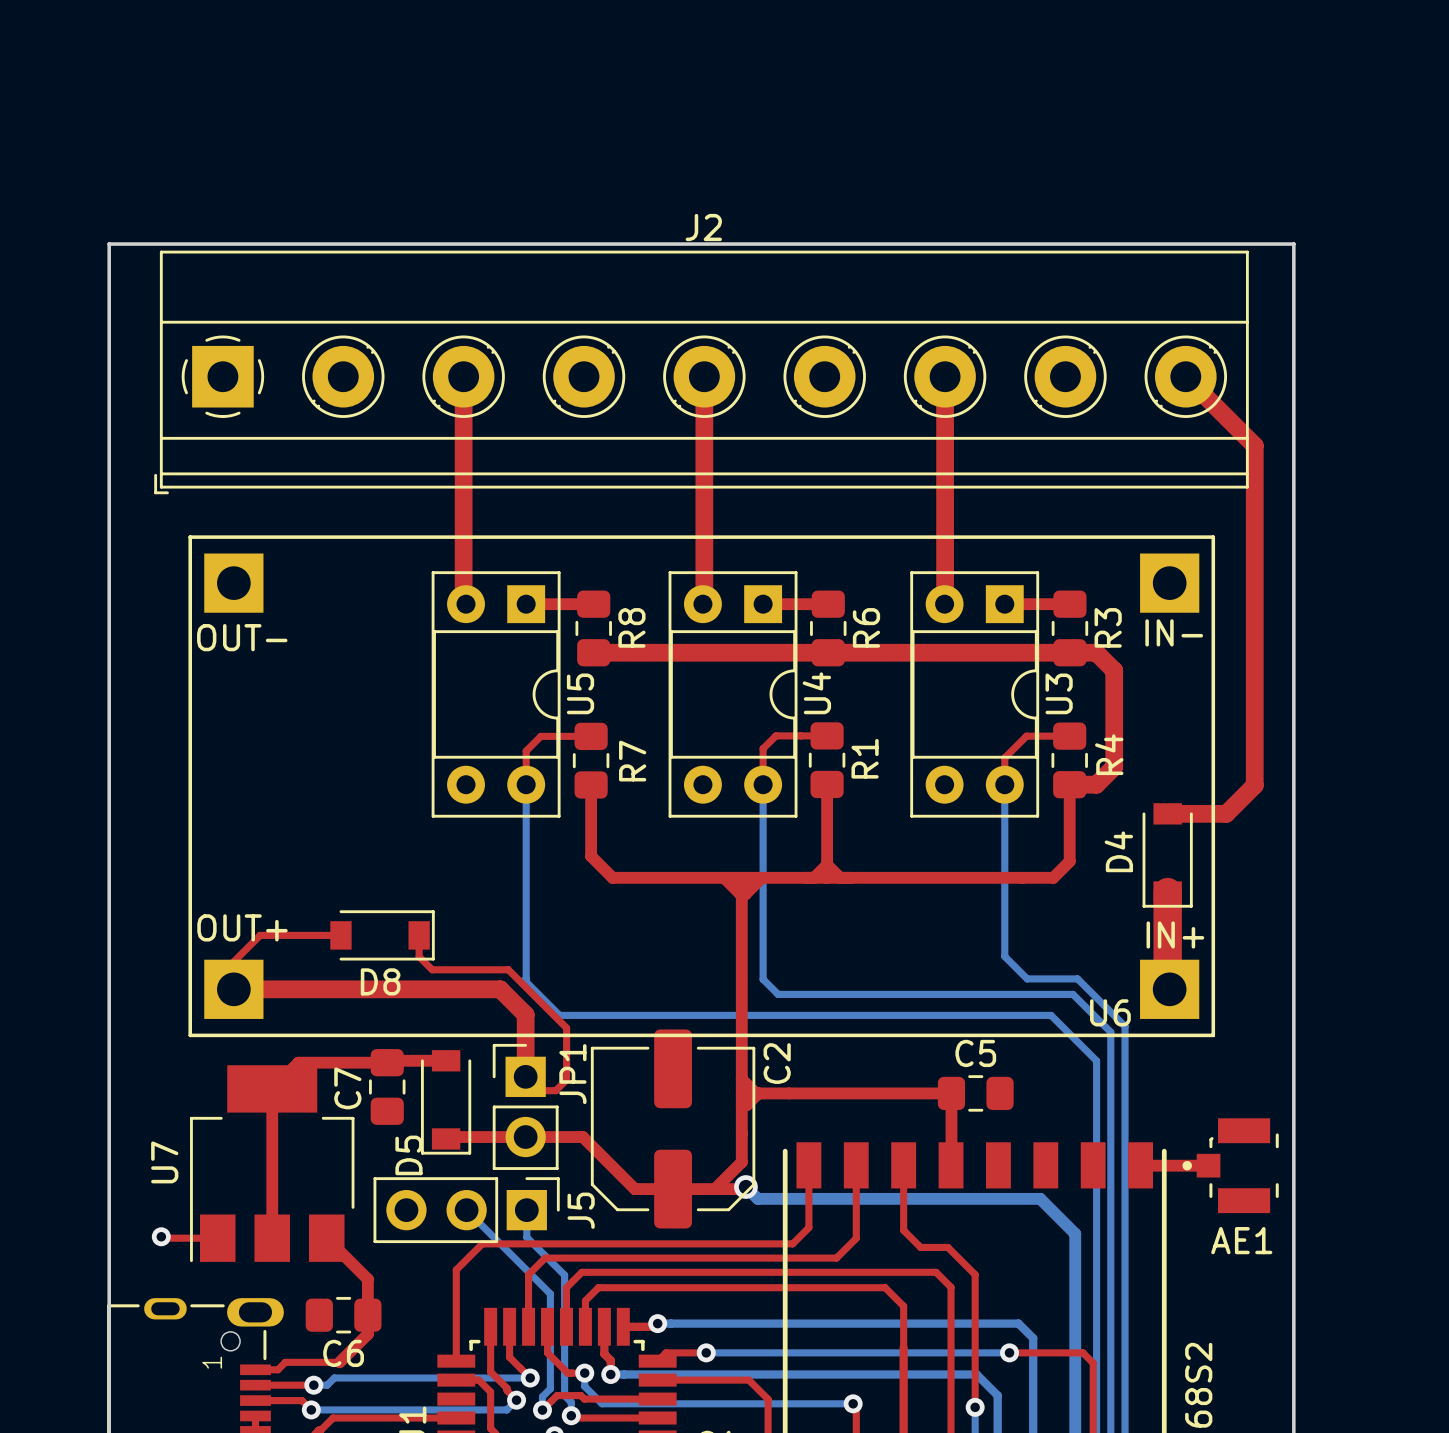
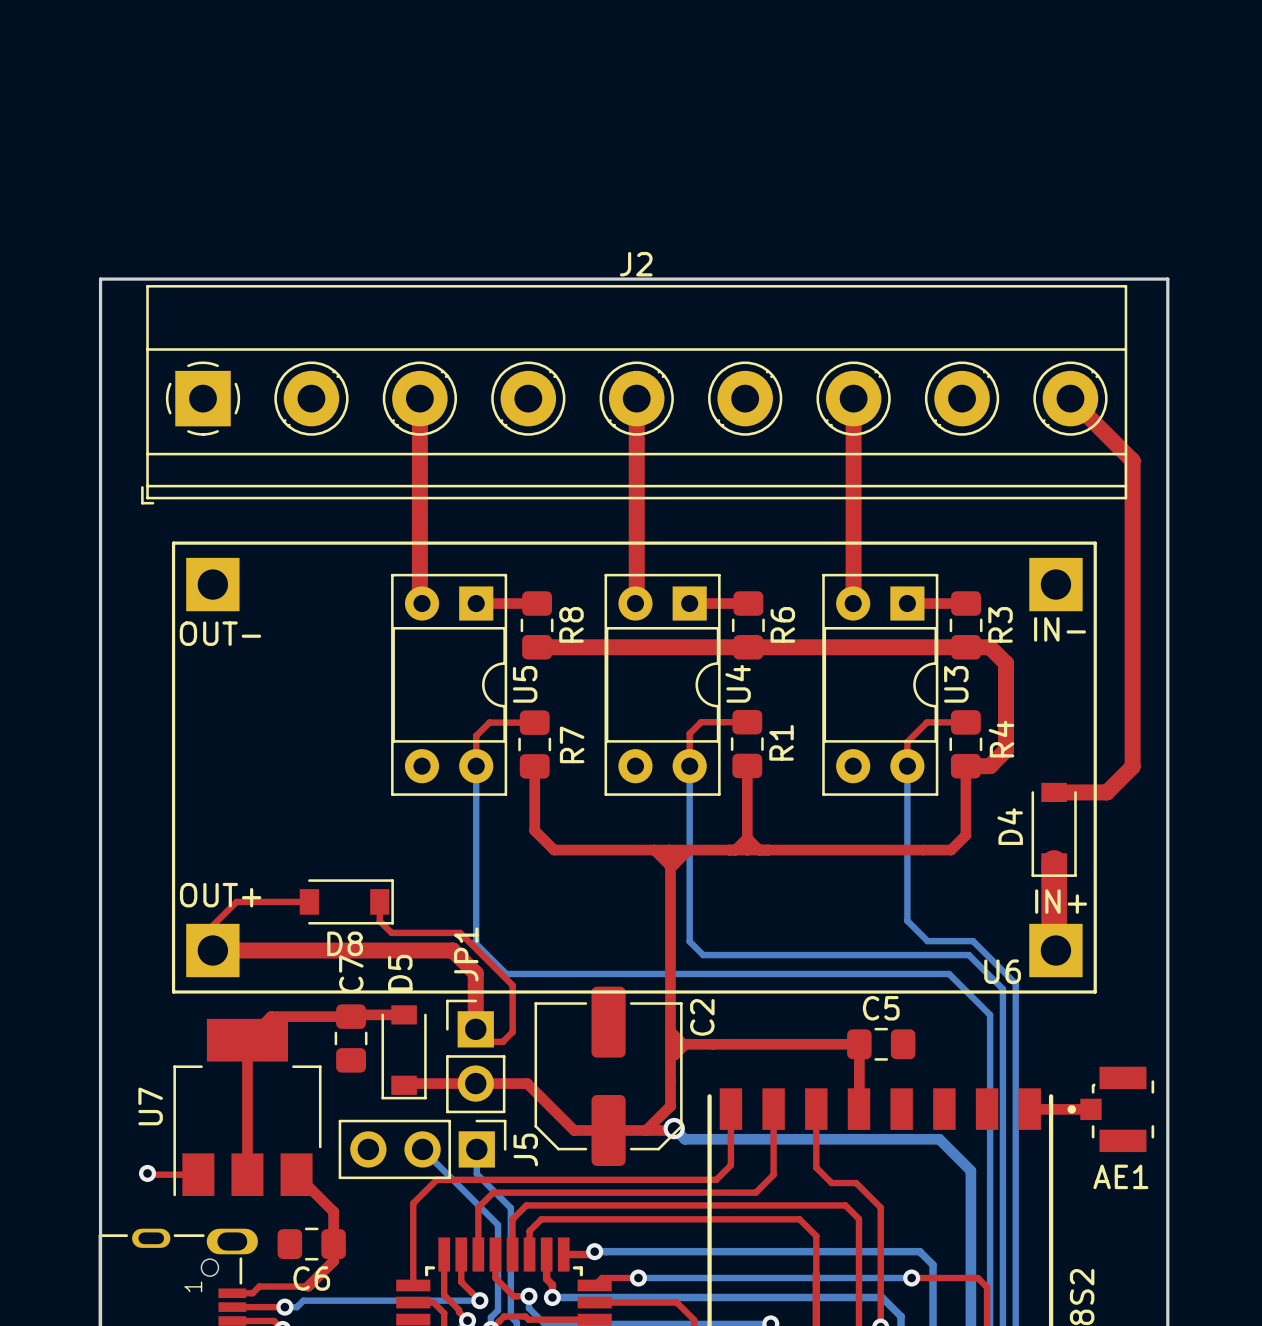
JP1 name position: JP1 (572, 1074) -> JP1 (466, 954)
C7 name position: C7 (347, 1088) -> C7 (351, 974)
D5 name position: D5 (408, 1155) -> D5 (400, 972)

